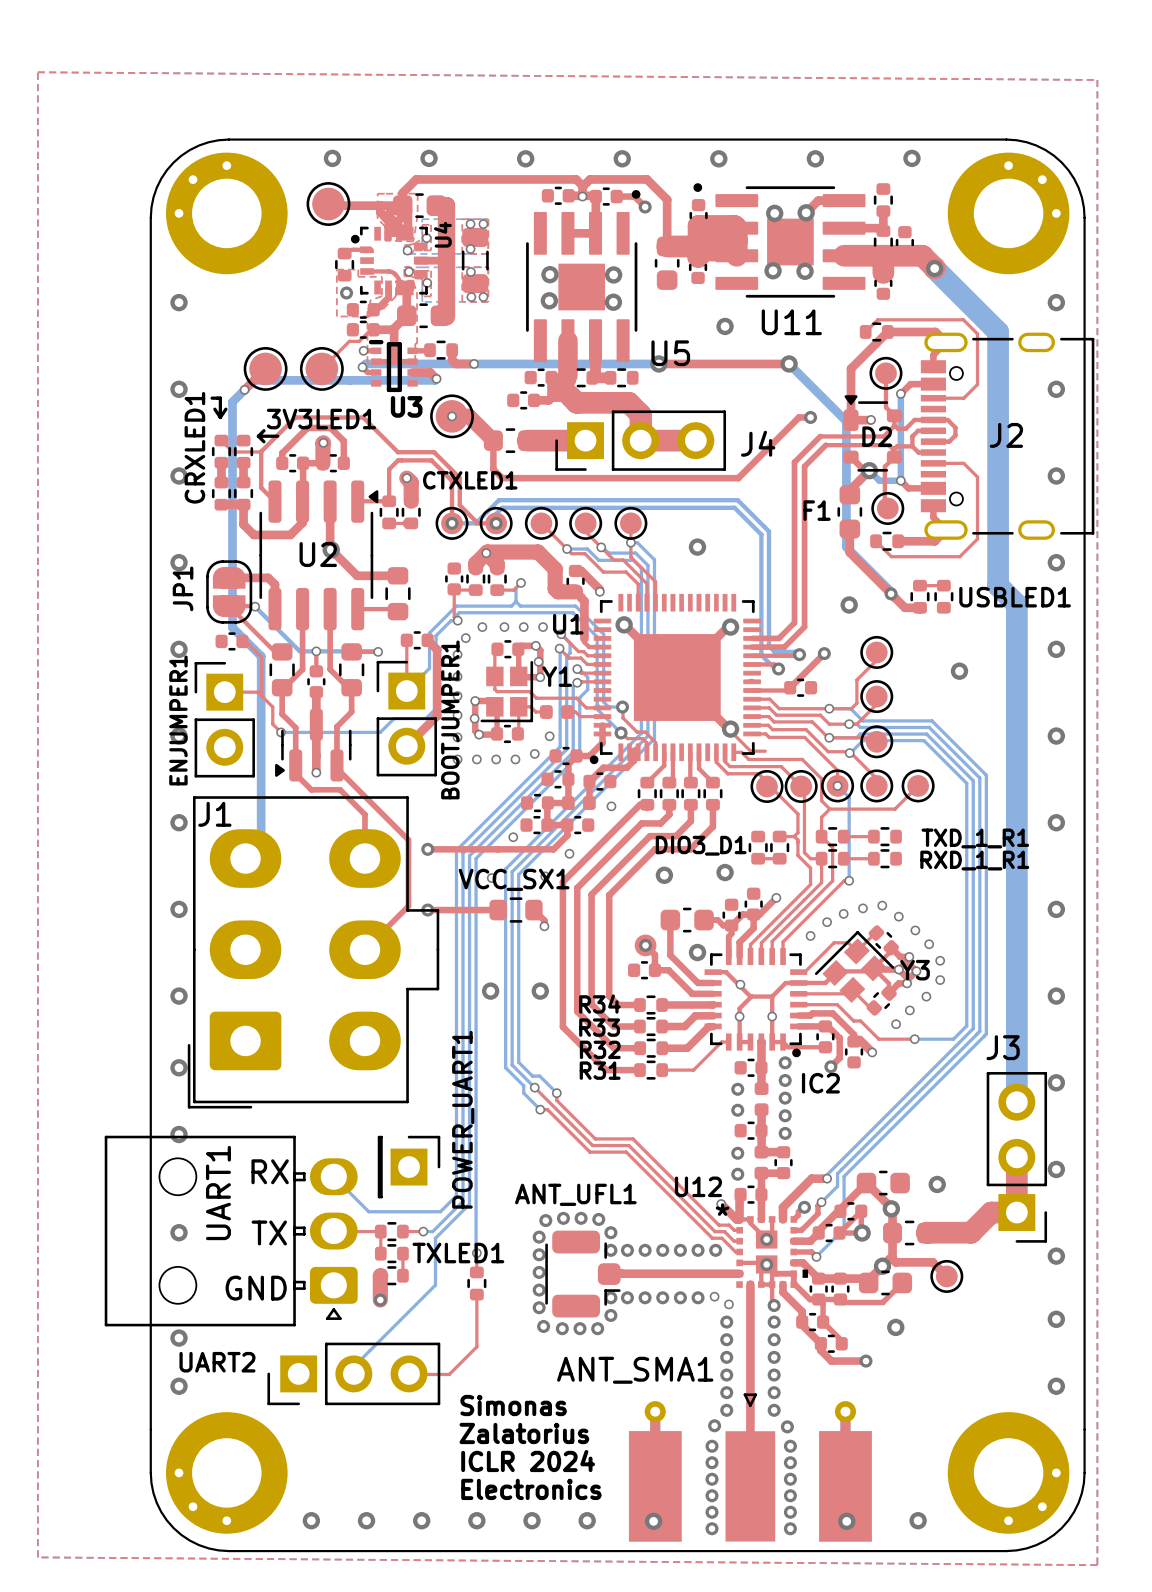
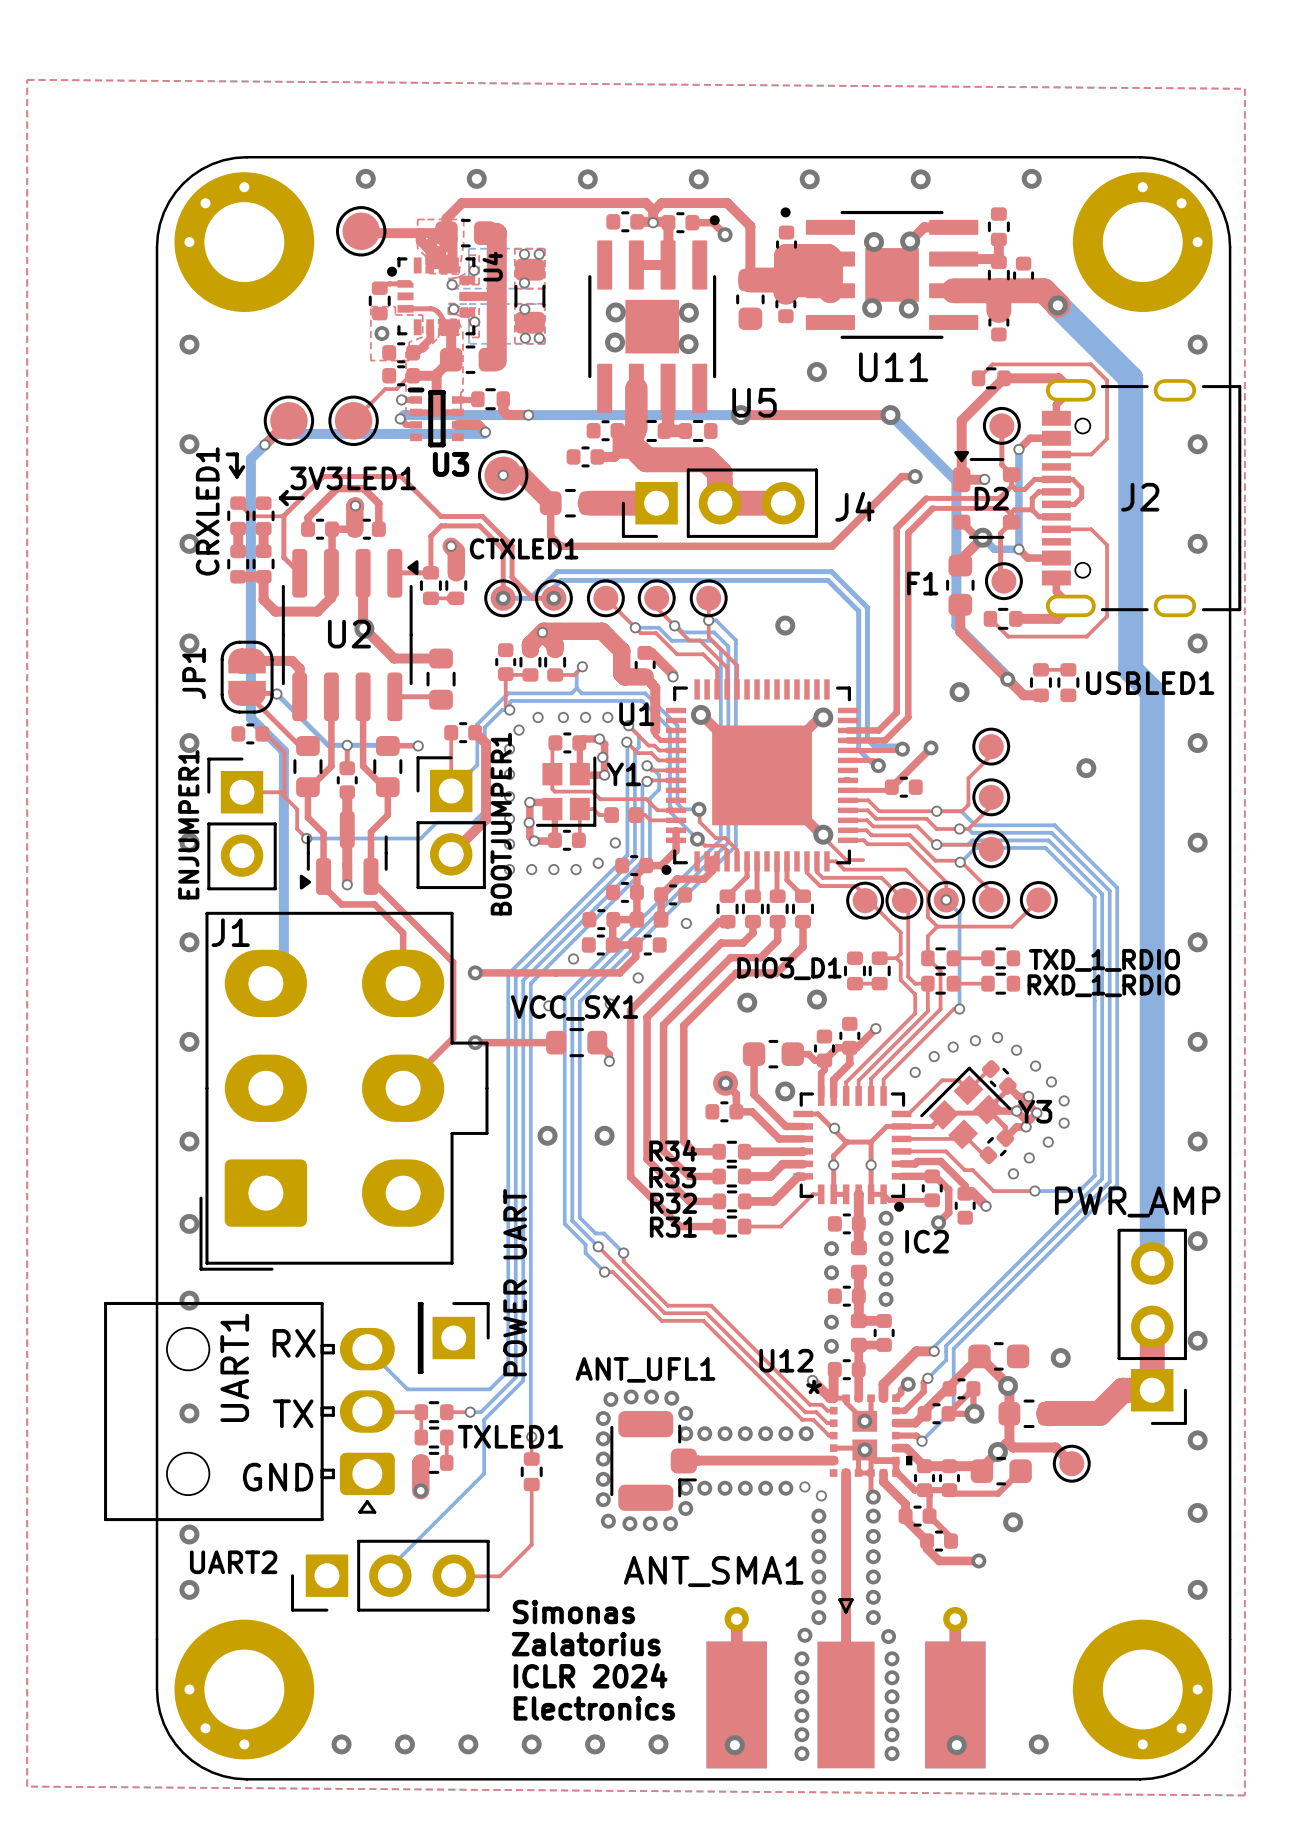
TXD_1_R1 name: TXD_1_R1 (975, 838) -> TXD_1_RDIO (1104, 960)
RXD_1_R1 name: RXD_1_R1 (974, 860) -> RXD_1_RDIO (1103, 985)
J3 name: J3 (1003, 1047) -> PWR_AMP (1137, 1201)
POWER_UART1 name: POWER_UART1 (463, 1119) -> POWER UART (515, 1282)

